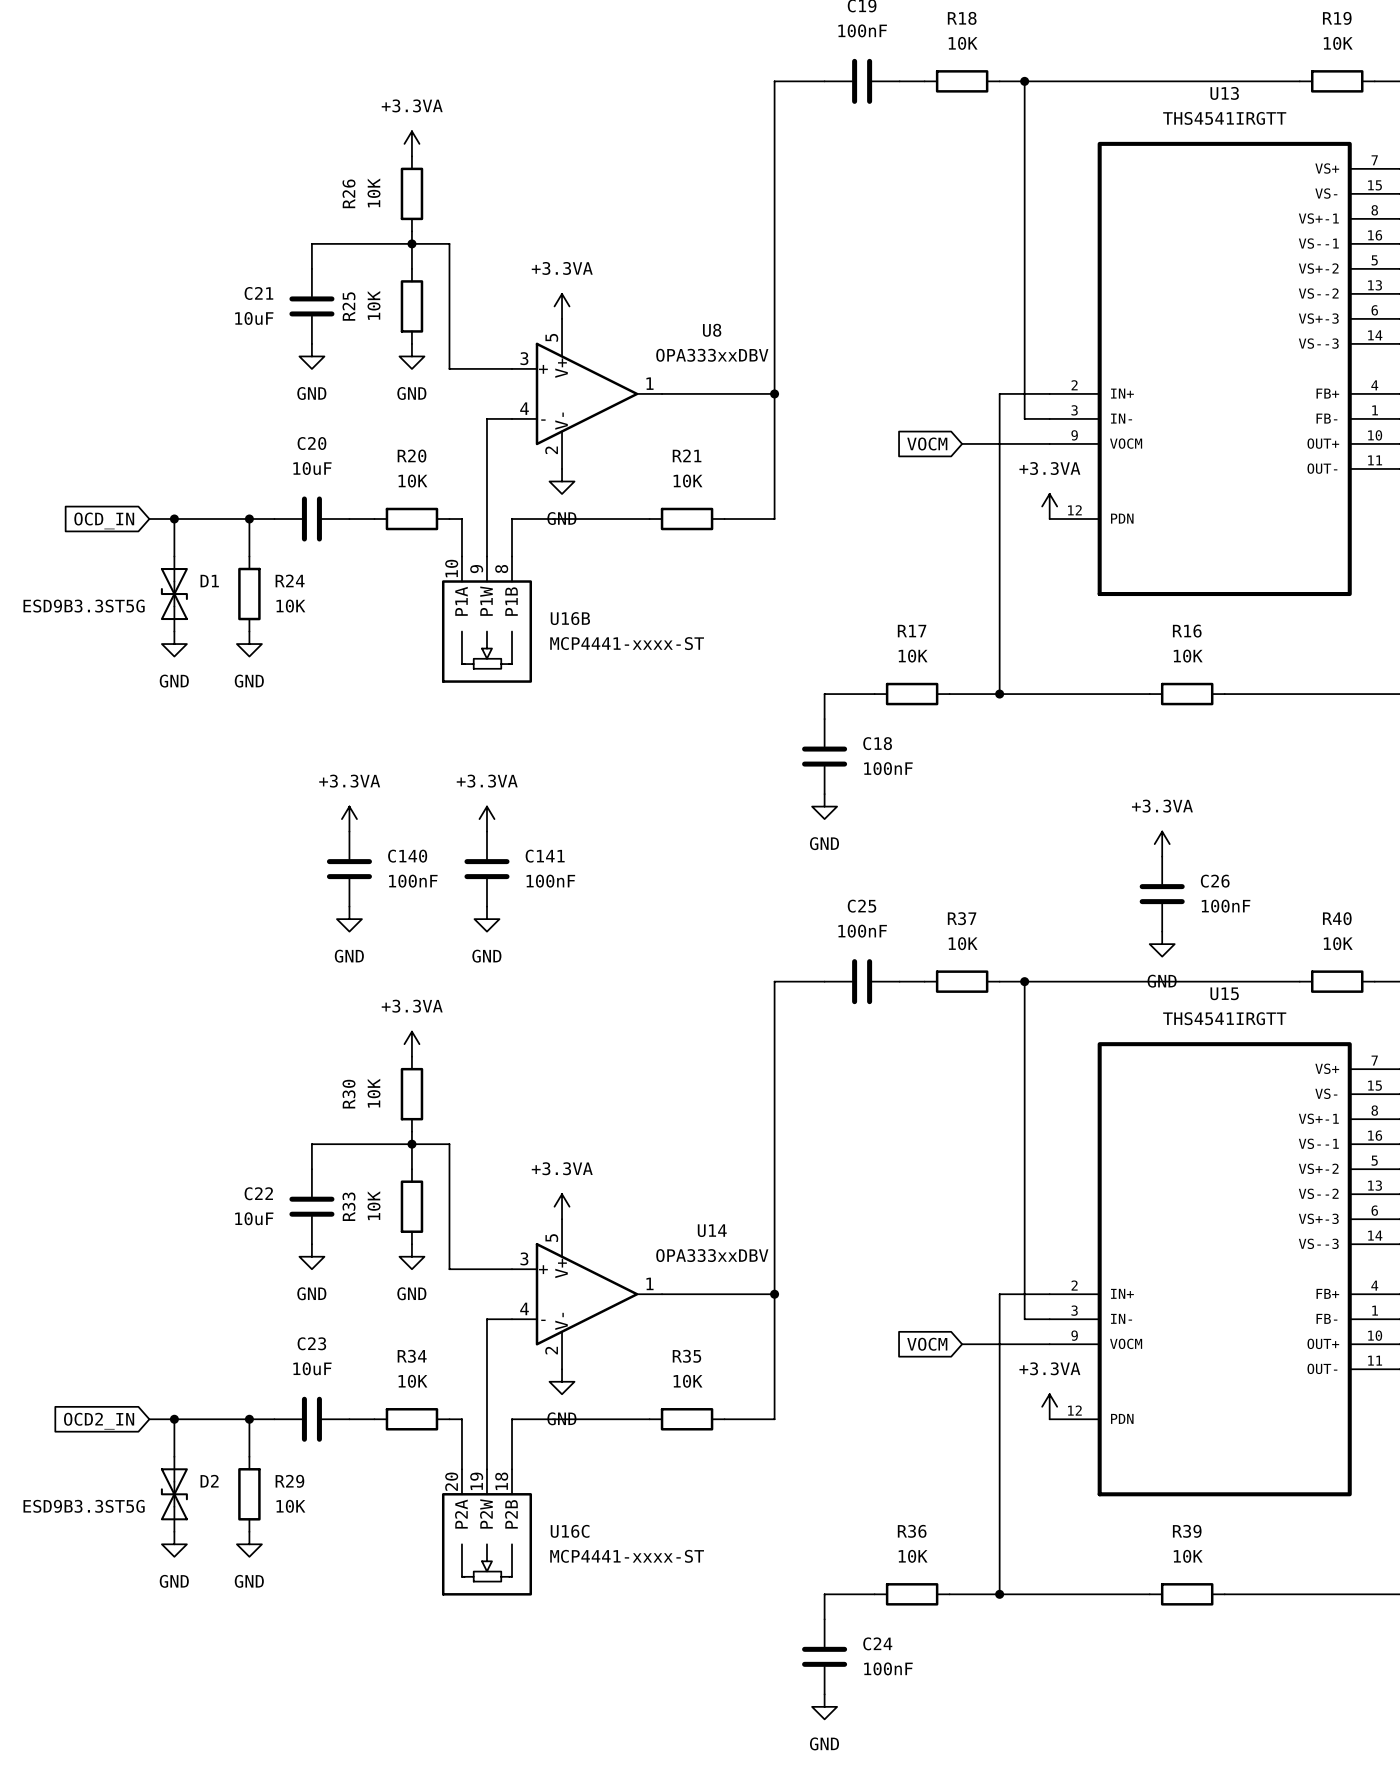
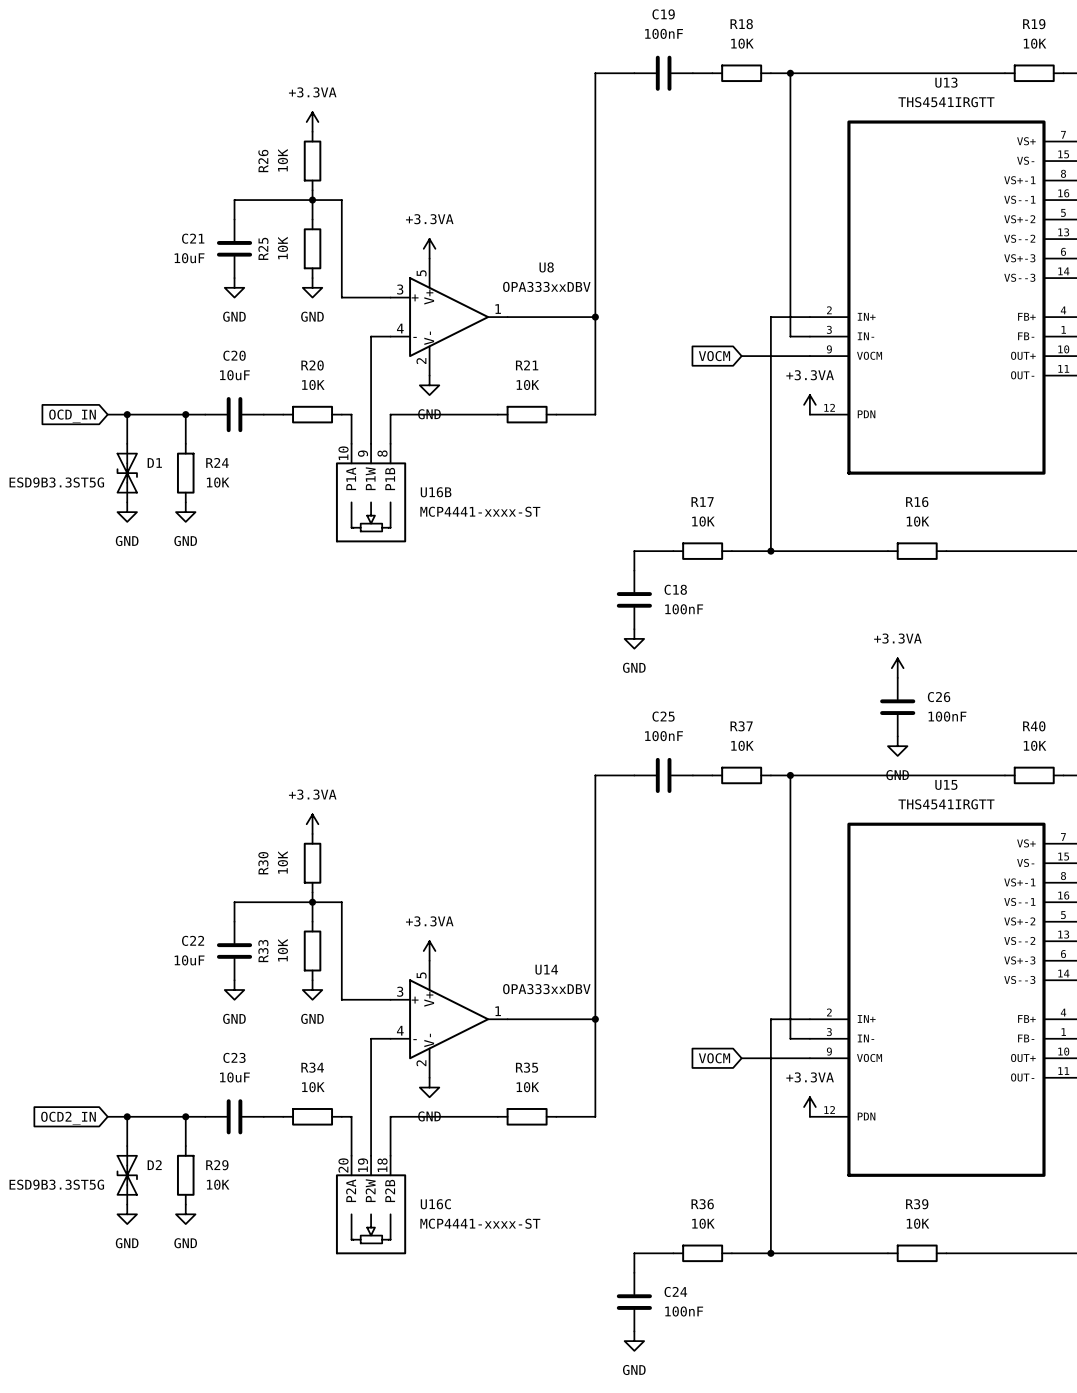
power symbol: +3.3VA (349, 819) -> none
power symbol: +3.3VA (486, 819) -> none
C140: 100nF (349, 869) -> none
C141: 100nF (486, 869) -> none
power symbol: GND (349, 919) -> none
power symbol: GND (486, 919) -> none

